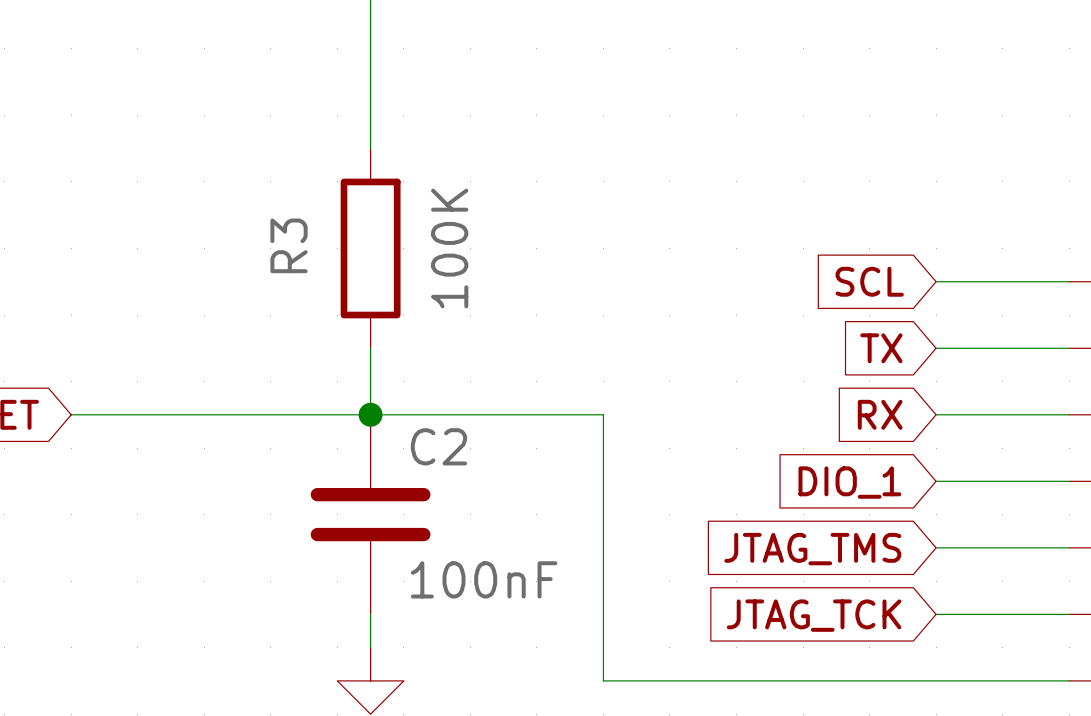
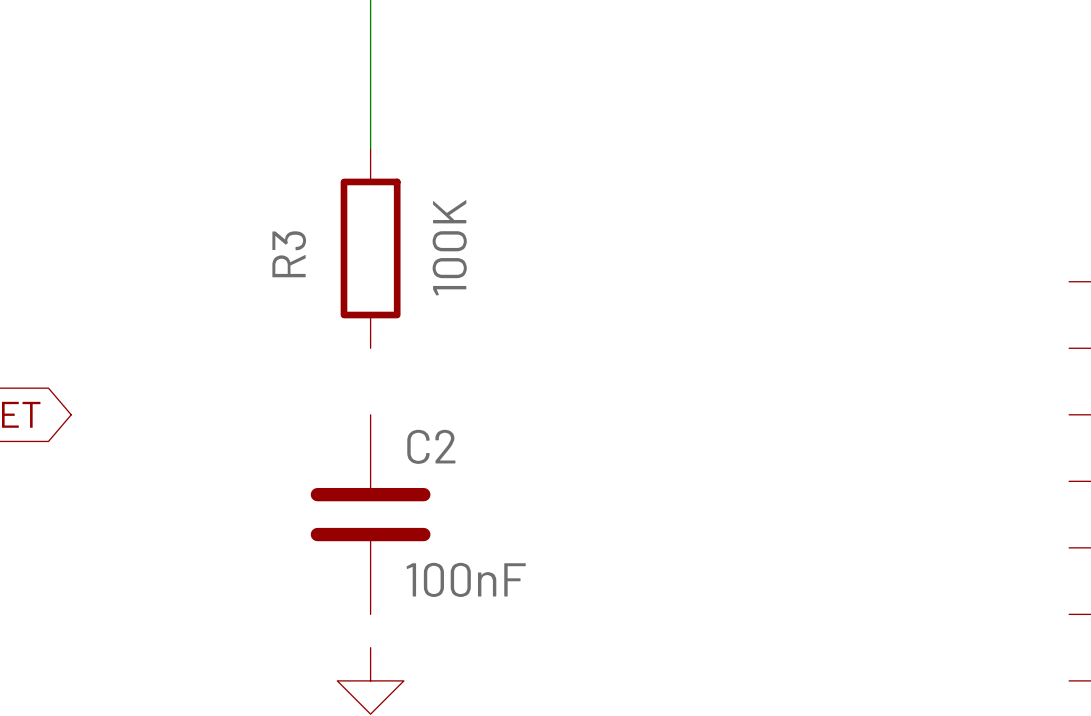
global label: SCL (869, 281) -> none
wire: (936, 281) (1069, 281) -> none
wire: (370, 348) (370, 414) -> none
global label: TX (881, 348) -> none
wire: (936, 348) (1069, 348) -> none
wire: (71, 414) (603, 414) (603, 680) (1069, 680) -> none
junction: (370, 414) -> none
global label: RX (880, 414) -> none
wire: (936, 414) (1069, 414) -> none
wire: (936, 481) (1069, 481) -> none
global label: DIO_1 (849, 482) -> none
wire: (936, 547) (1069, 547) -> none
global label: JTAG_TMS (812, 549) -> none
wire: (370, 614) (370, 647) -> none
wire: (936, 614) (1069, 614) -> none
global label: JTAG_TCK (814, 615) -> none

